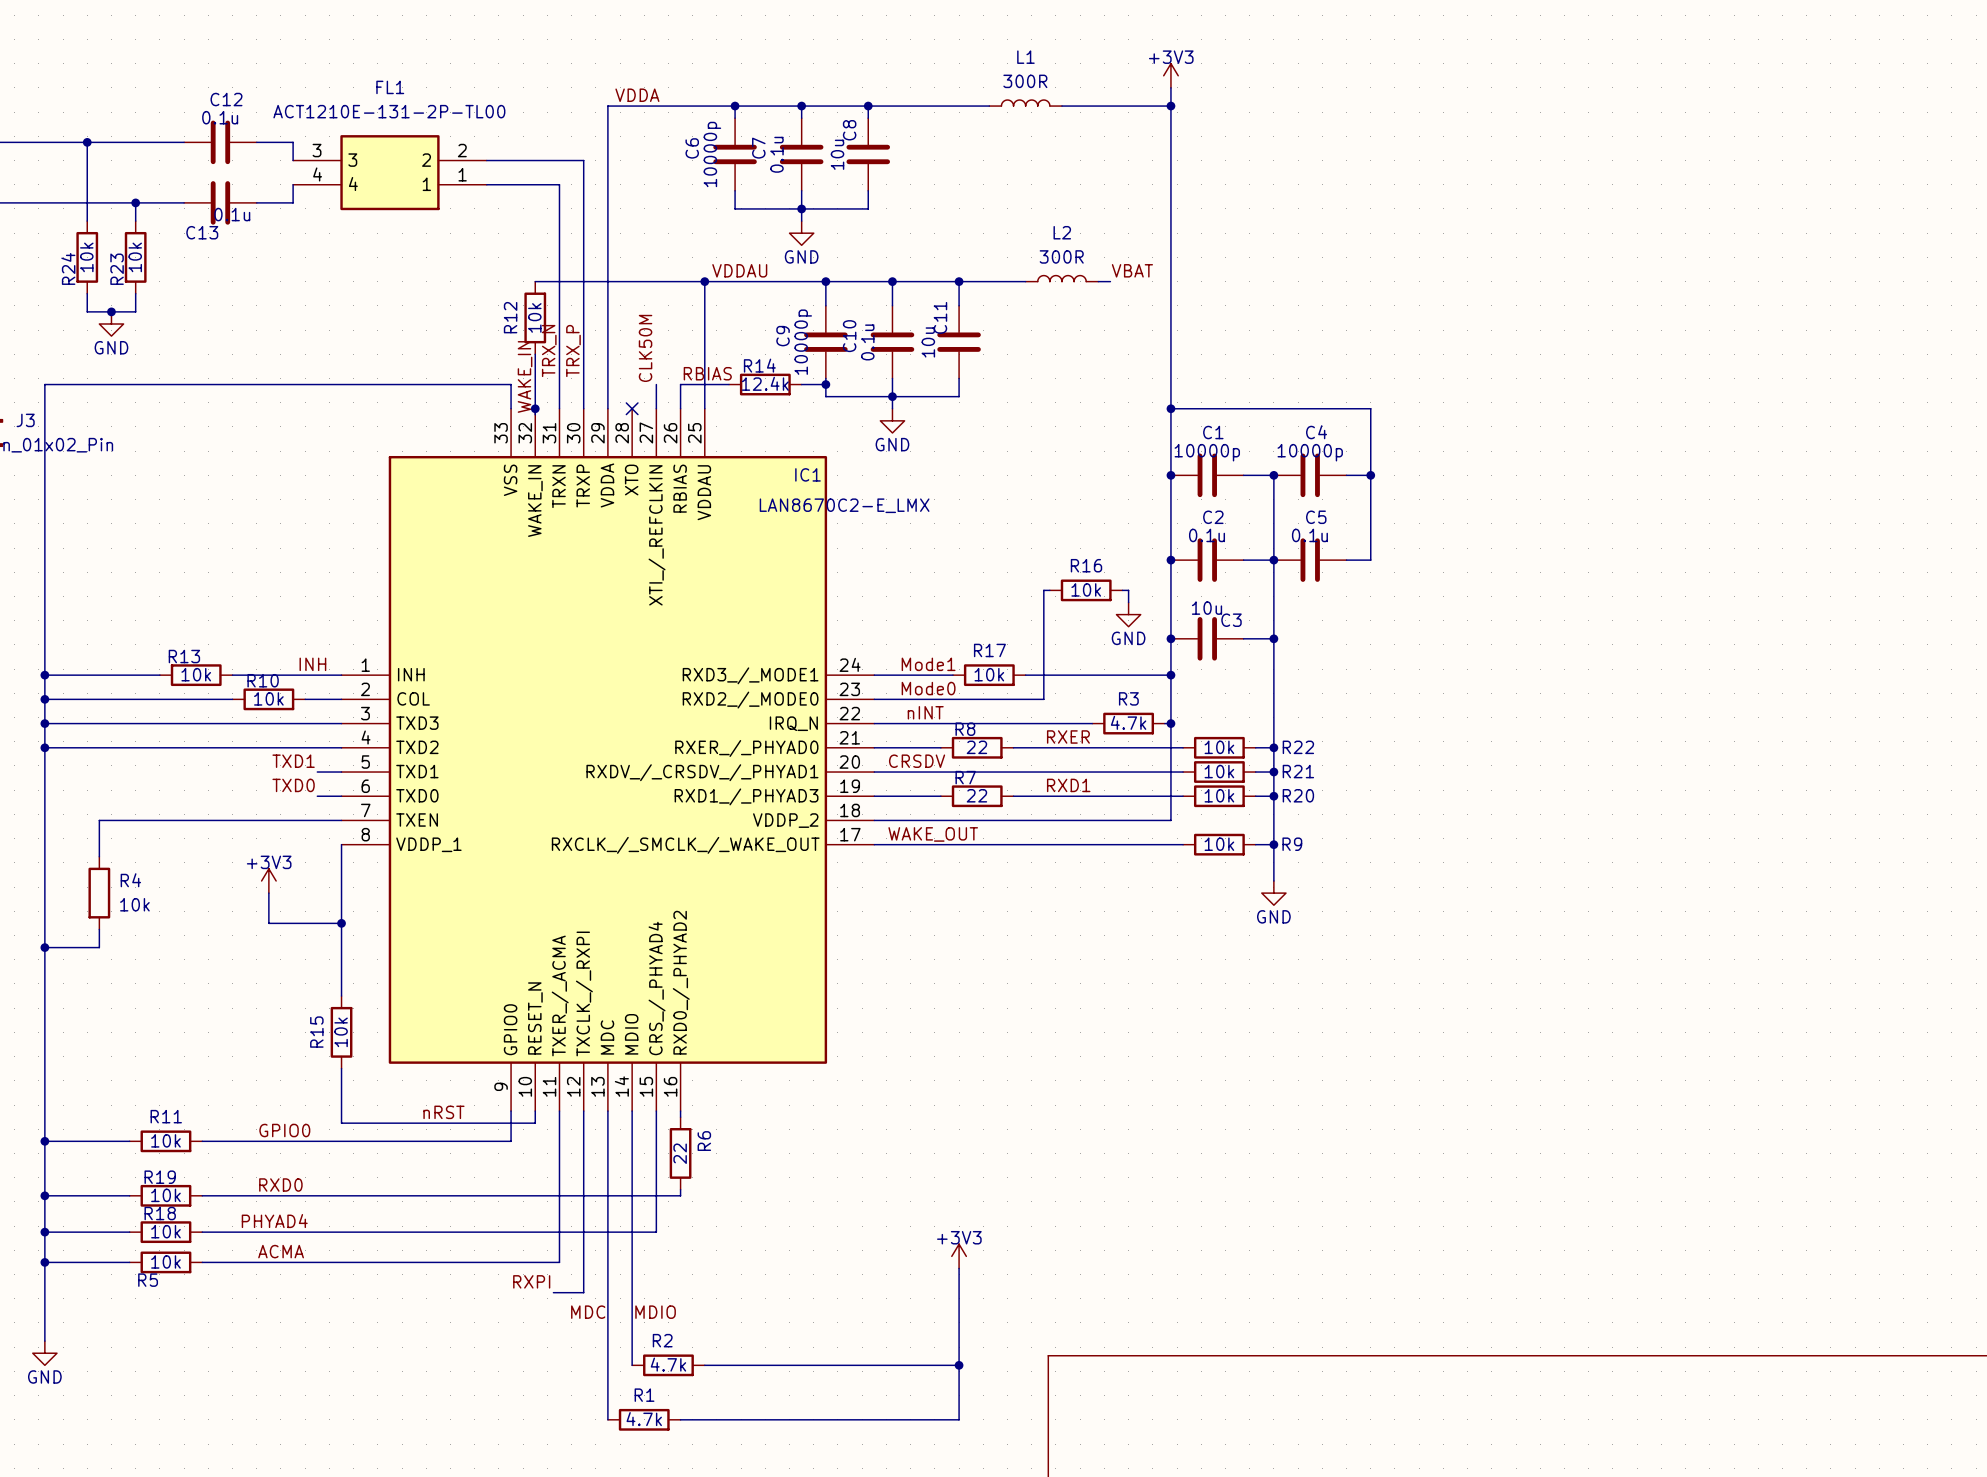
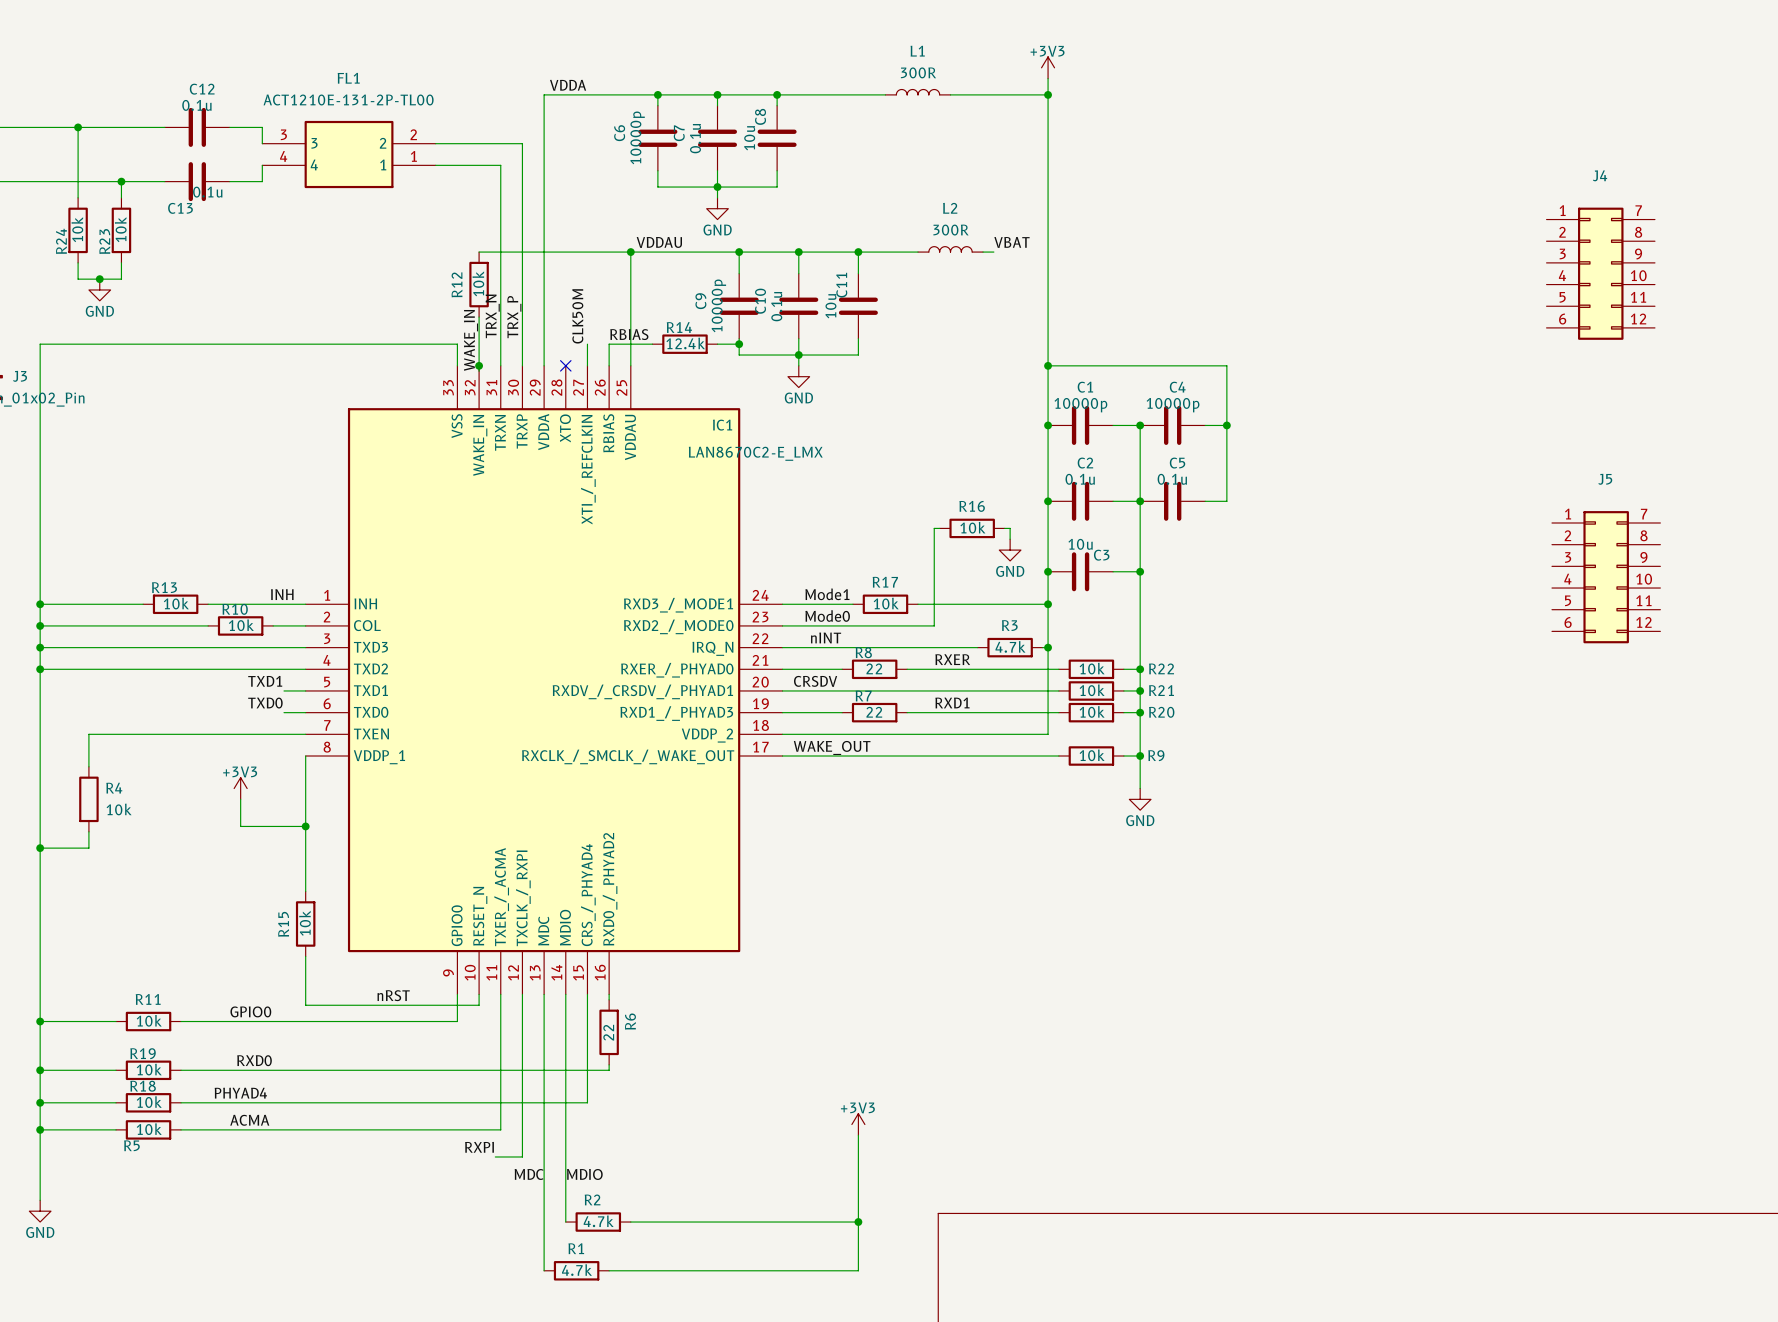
J4: none -> (1600, 273)
J5: none -> (1606, 577)

